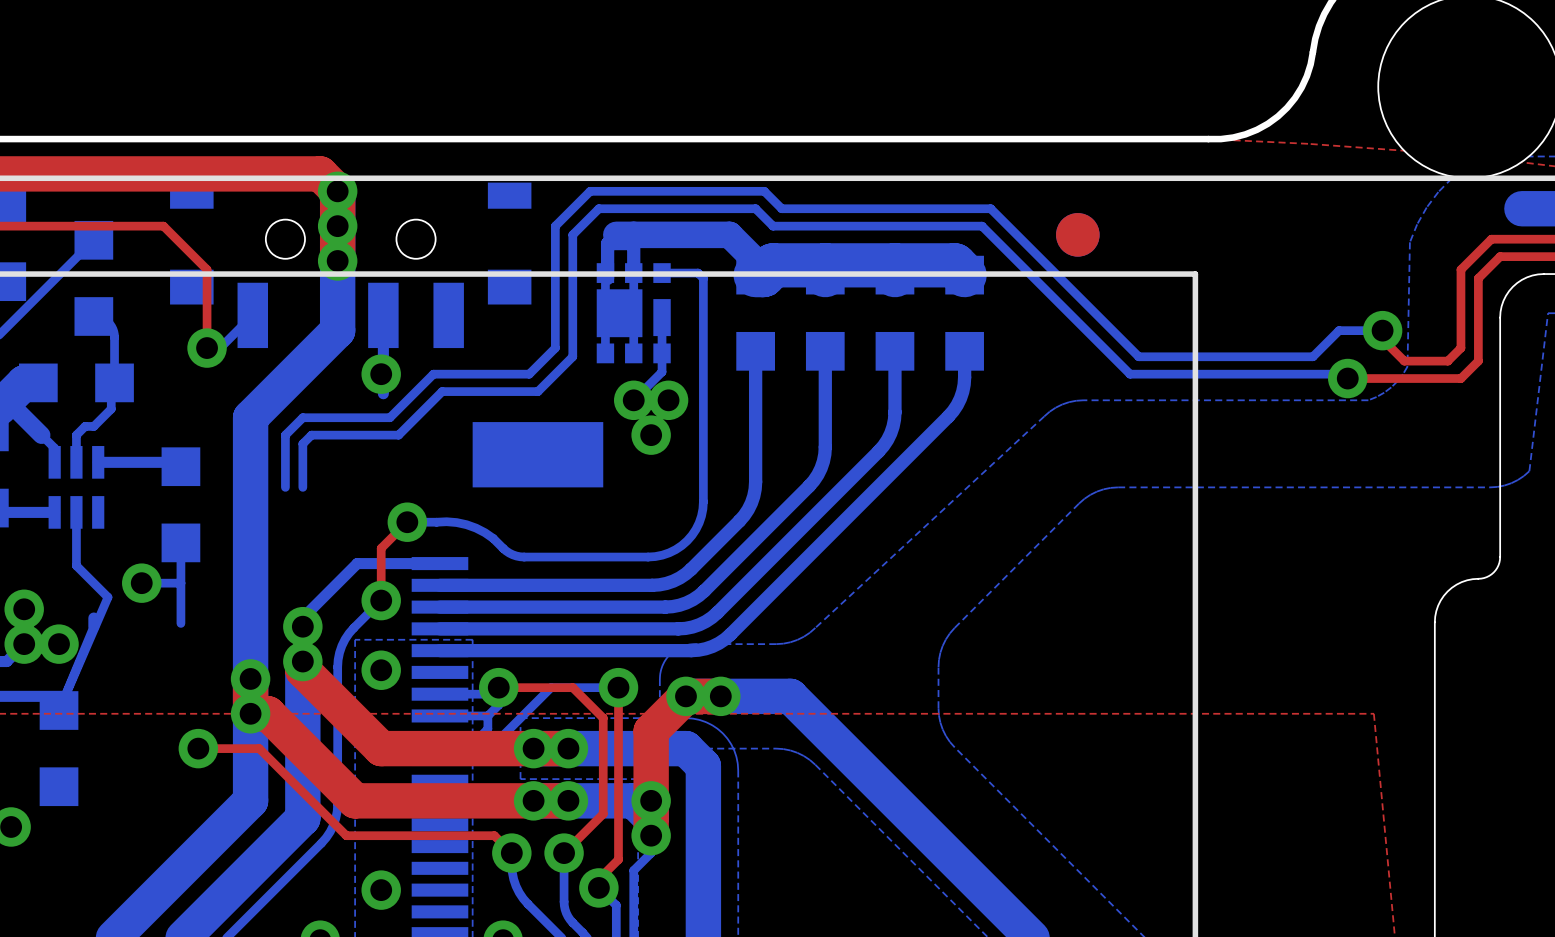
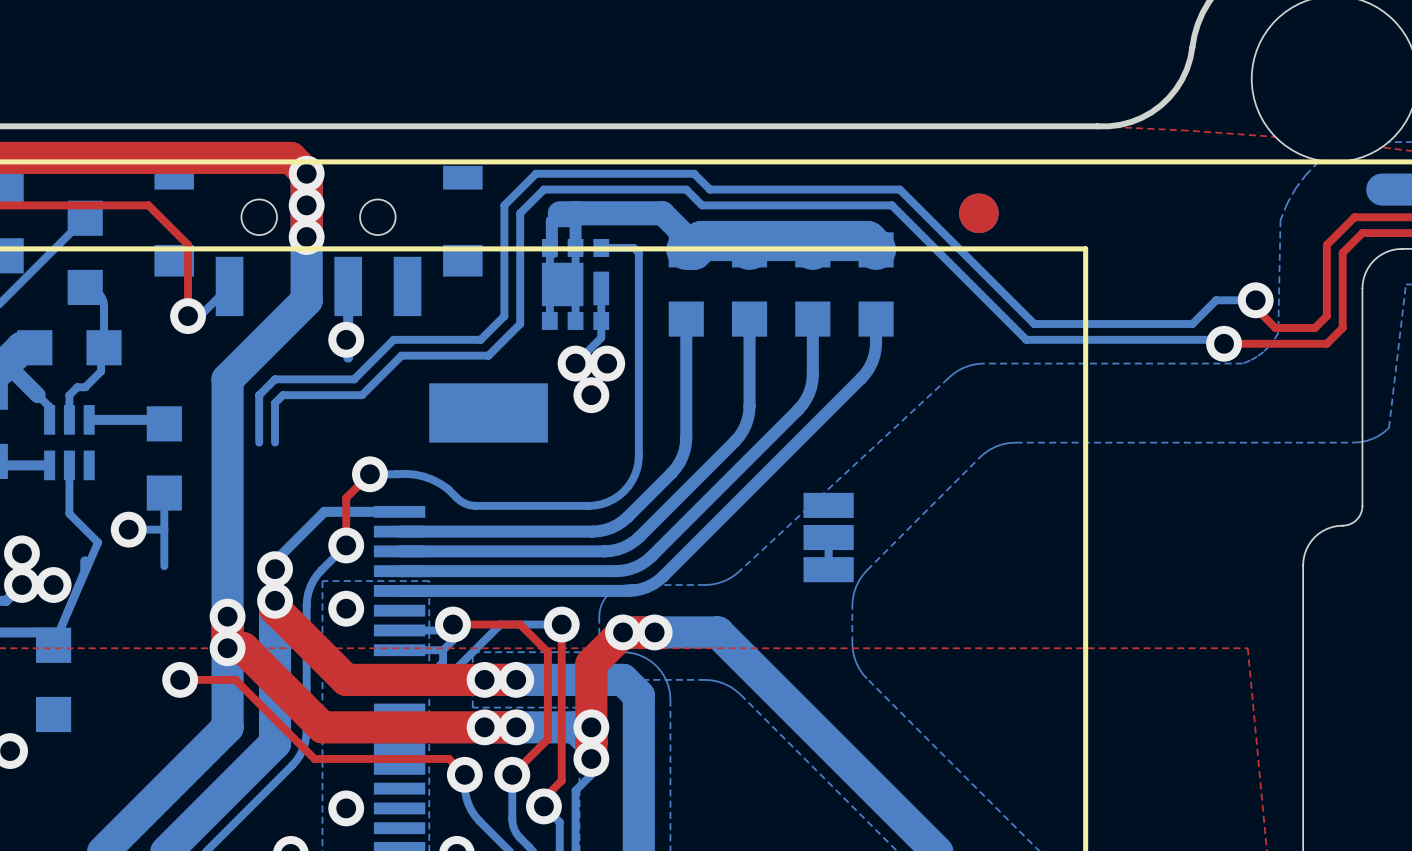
part: none -> (828, 537)

